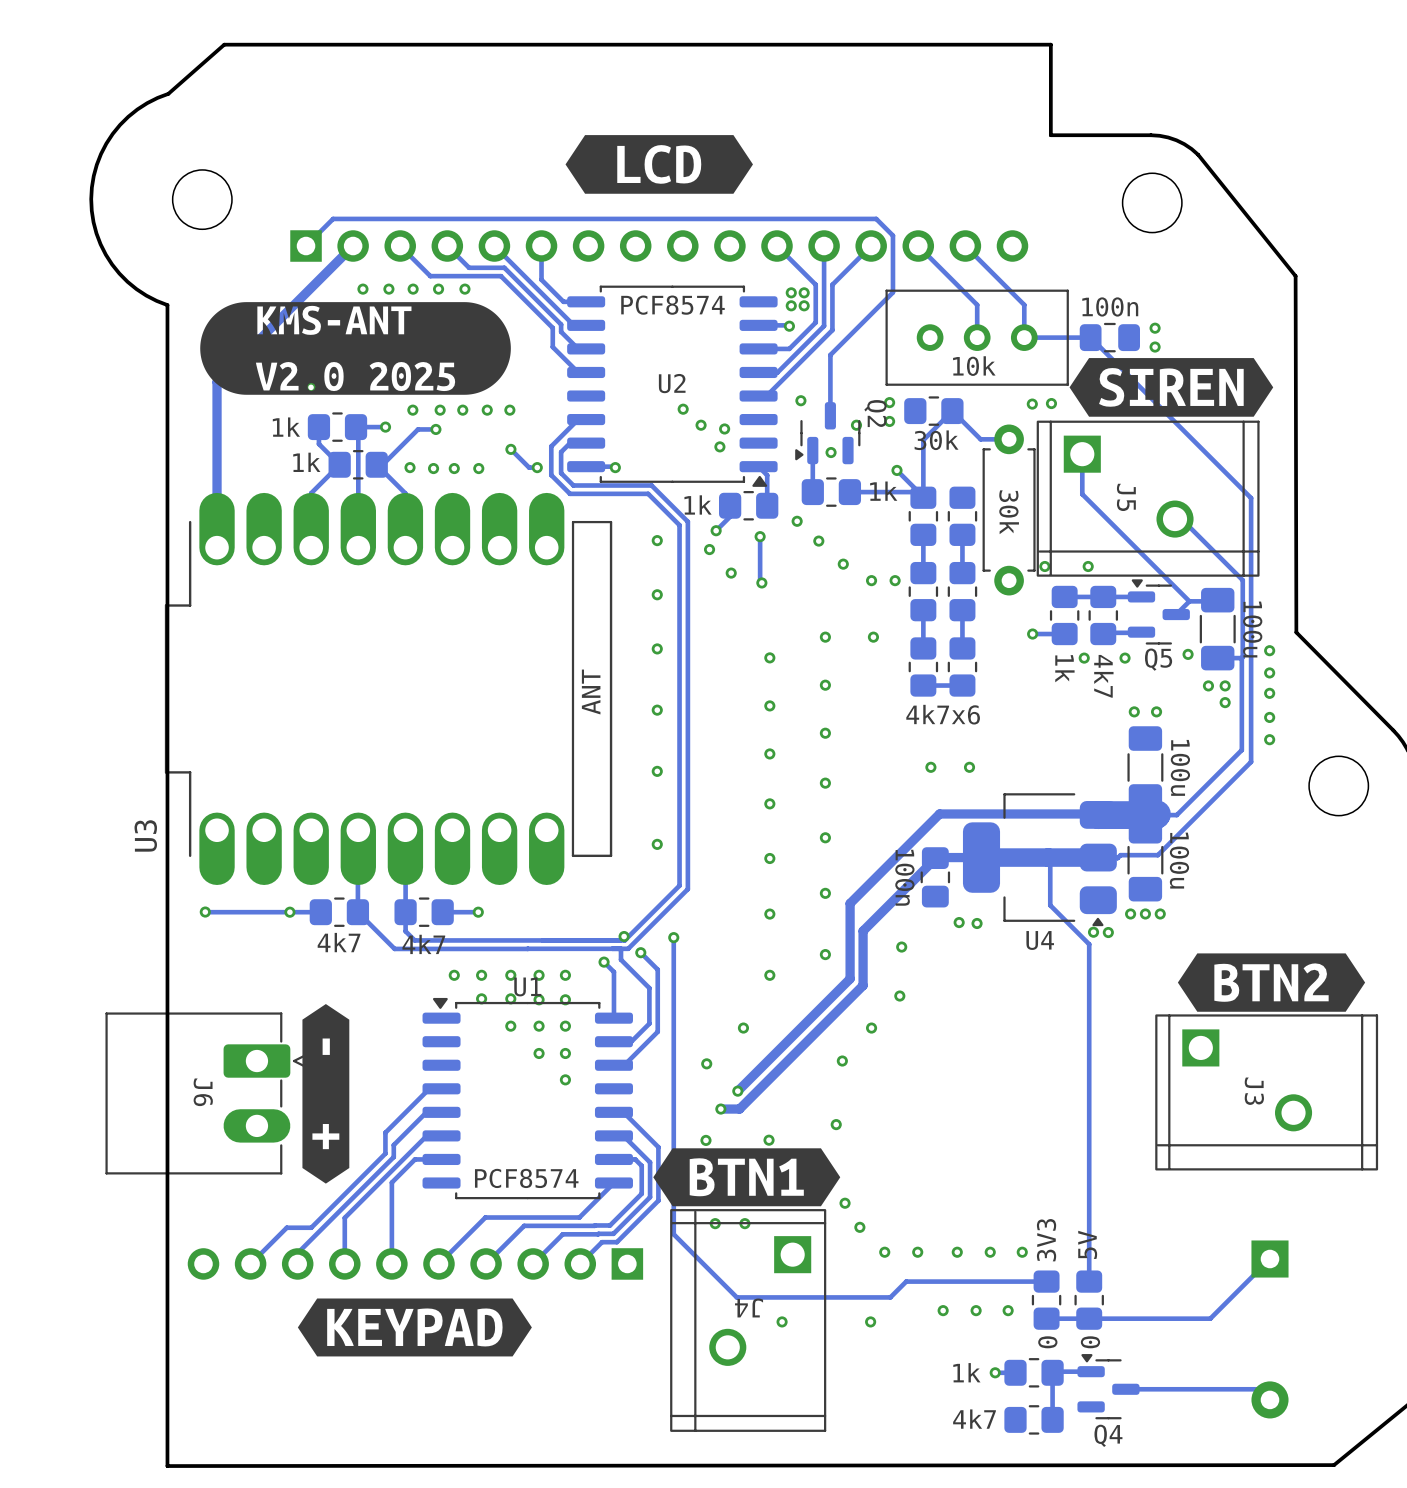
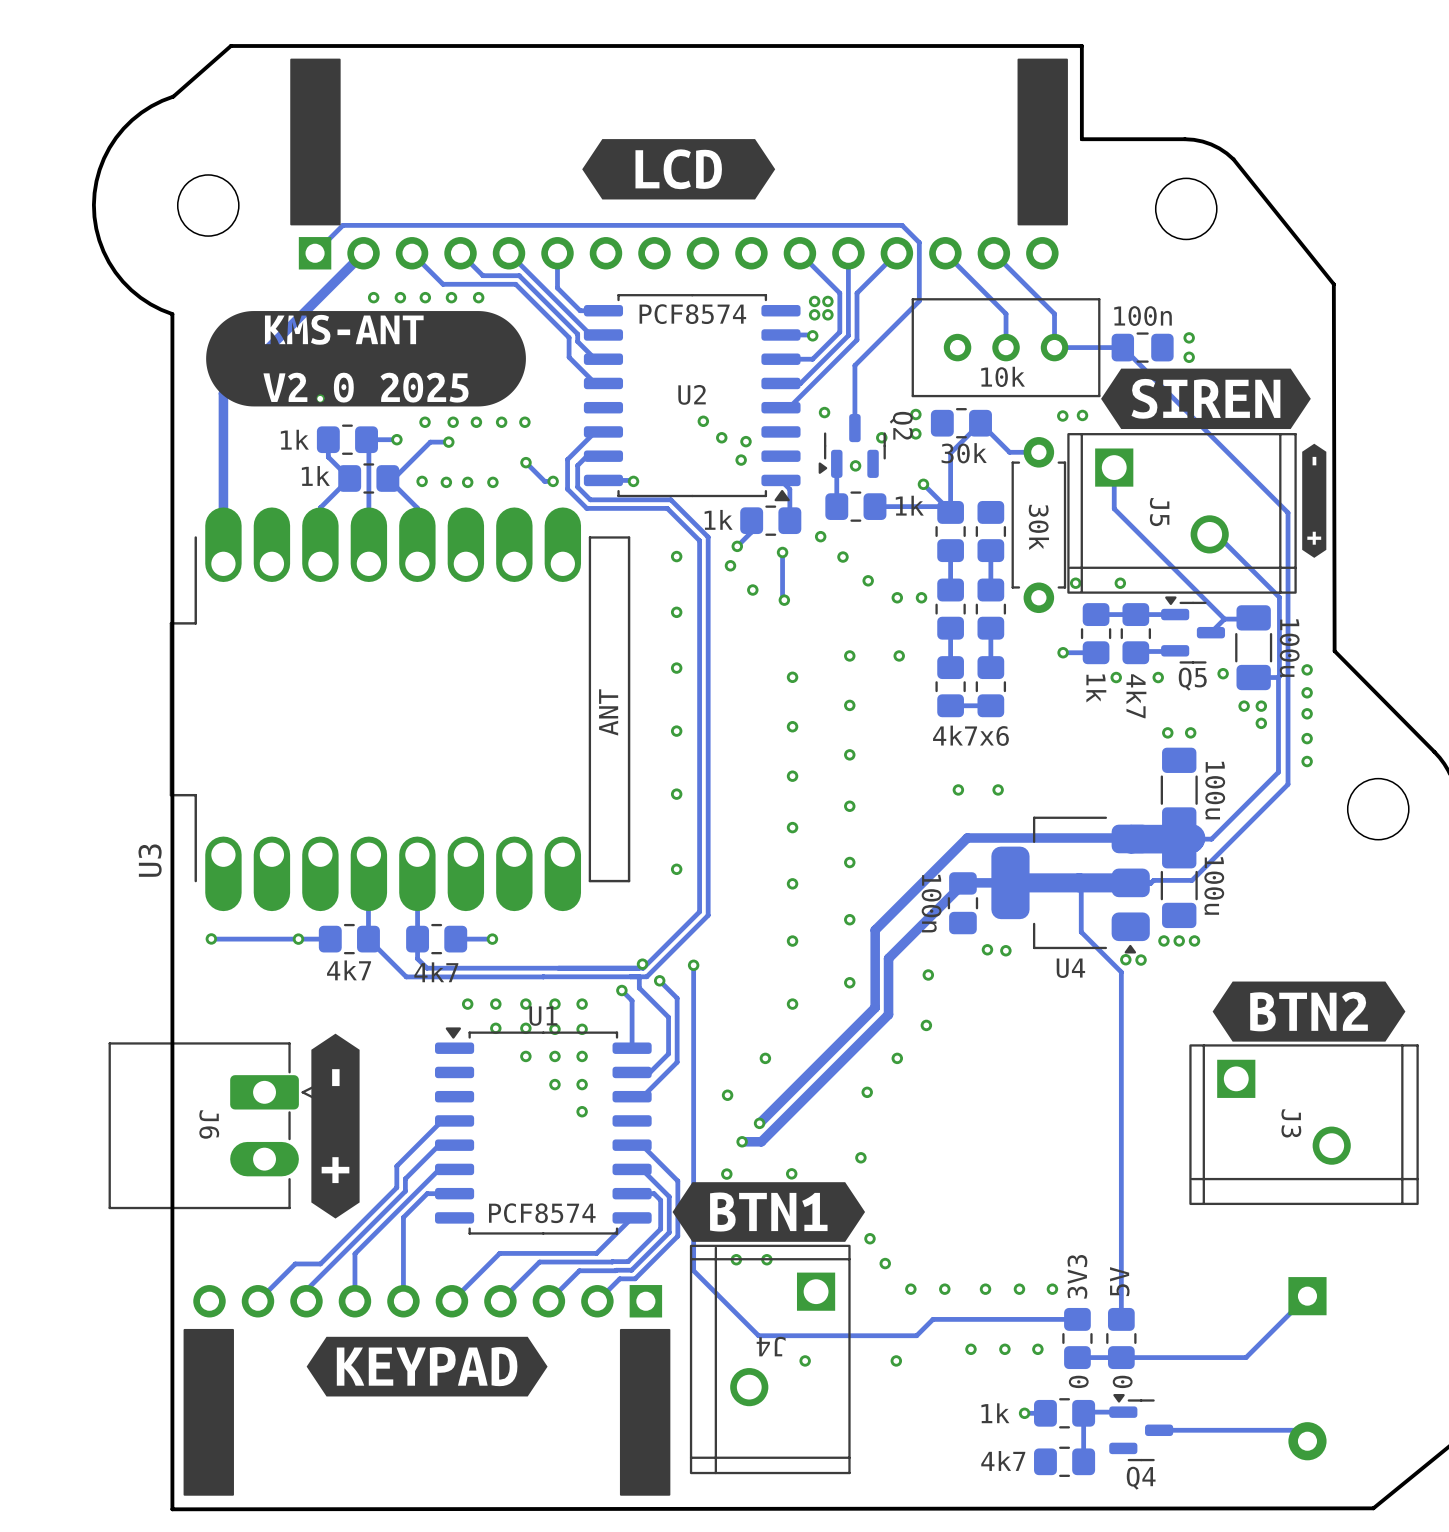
drawing: none -> [290, 58, 341, 226]
drawing: none -> [1017, 58, 1068, 226]
drawing: none -> [1302, 443, 1327, 558]
drawing: none -> [183, 1328, 234, 1496]
drawing: none -> [619, 1328, 671, 1496]

